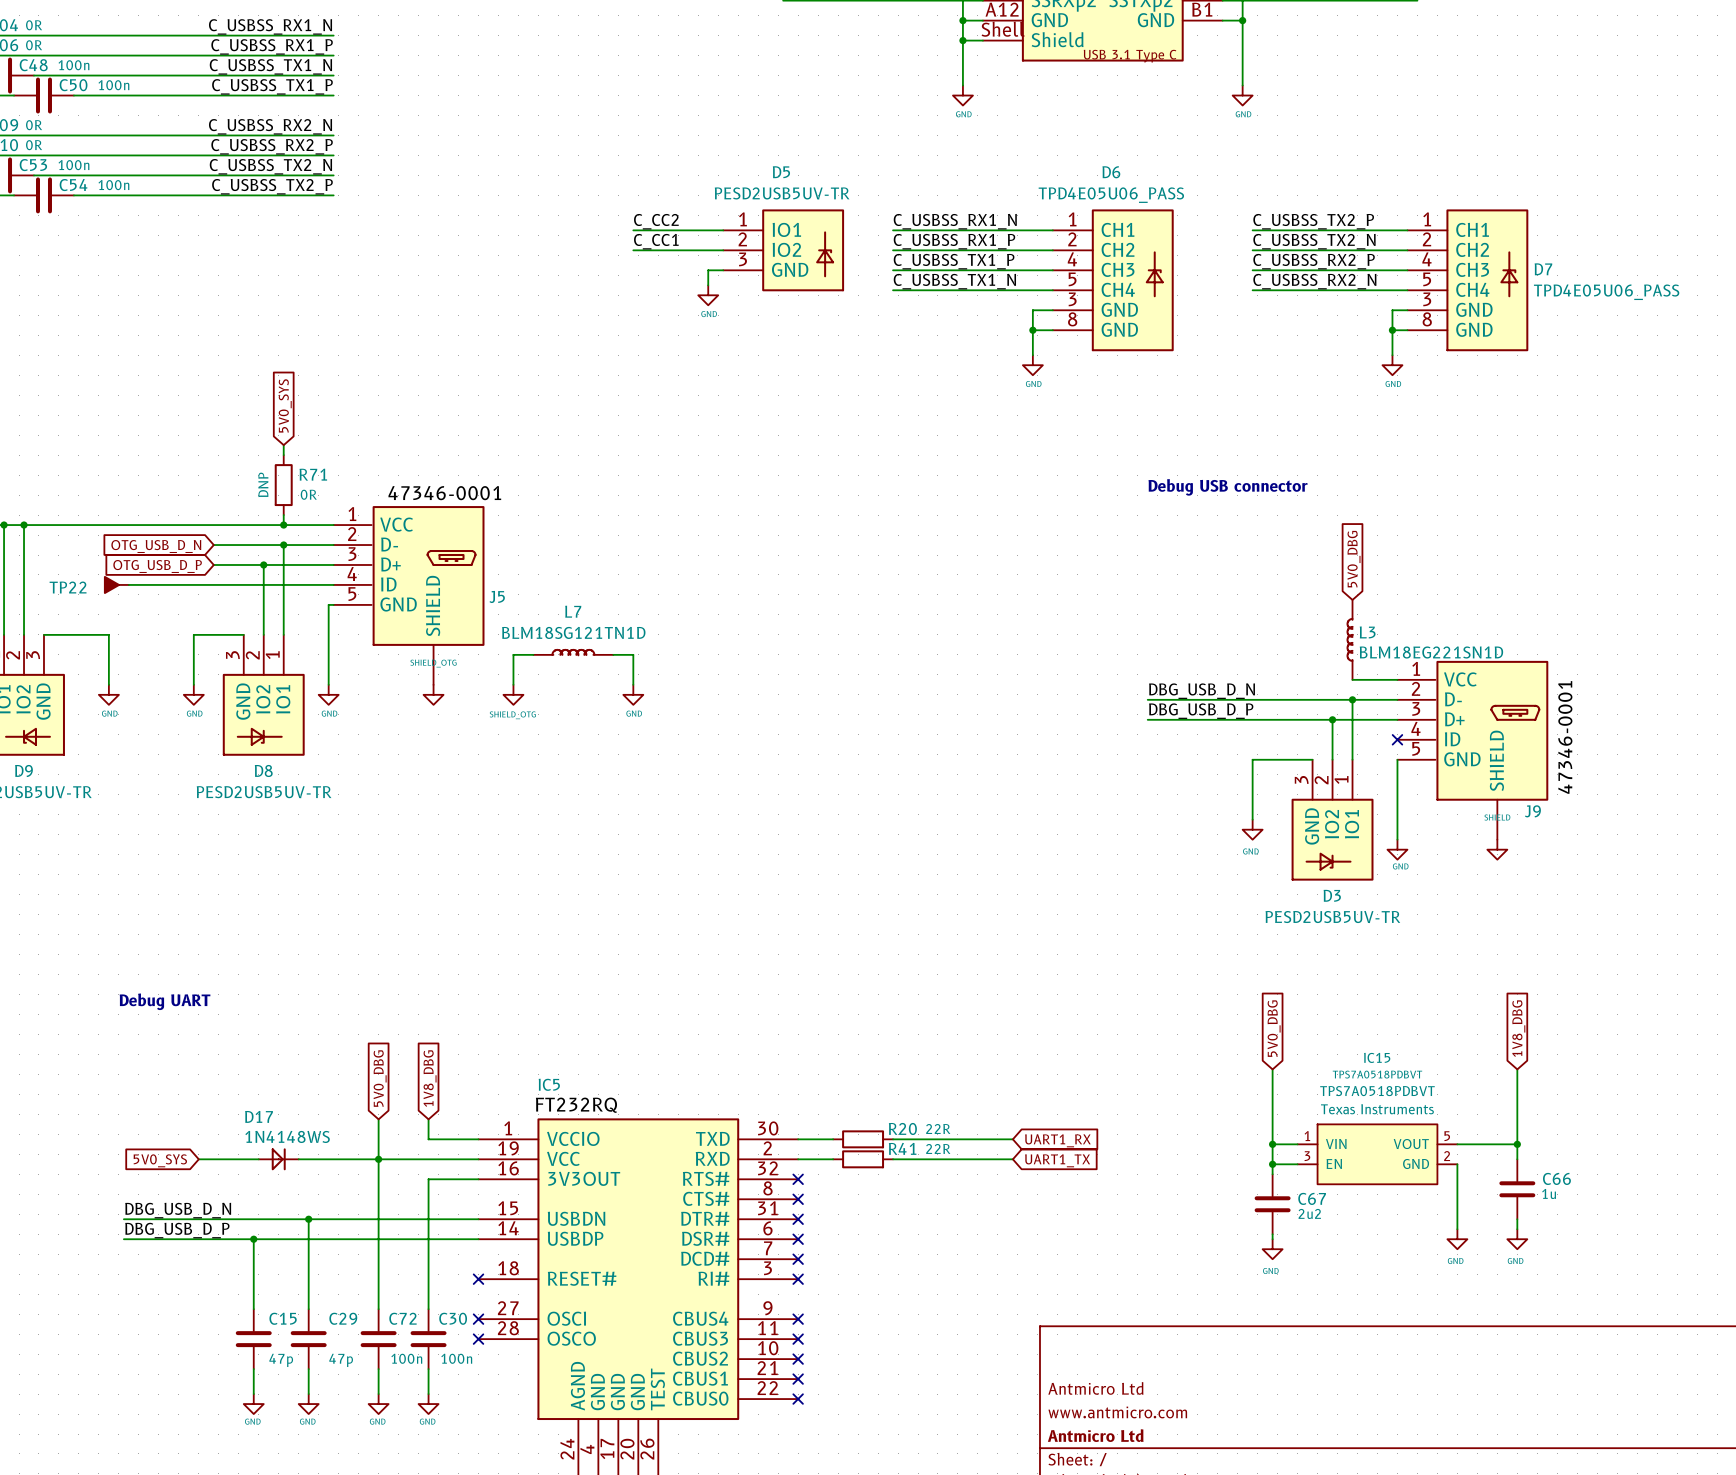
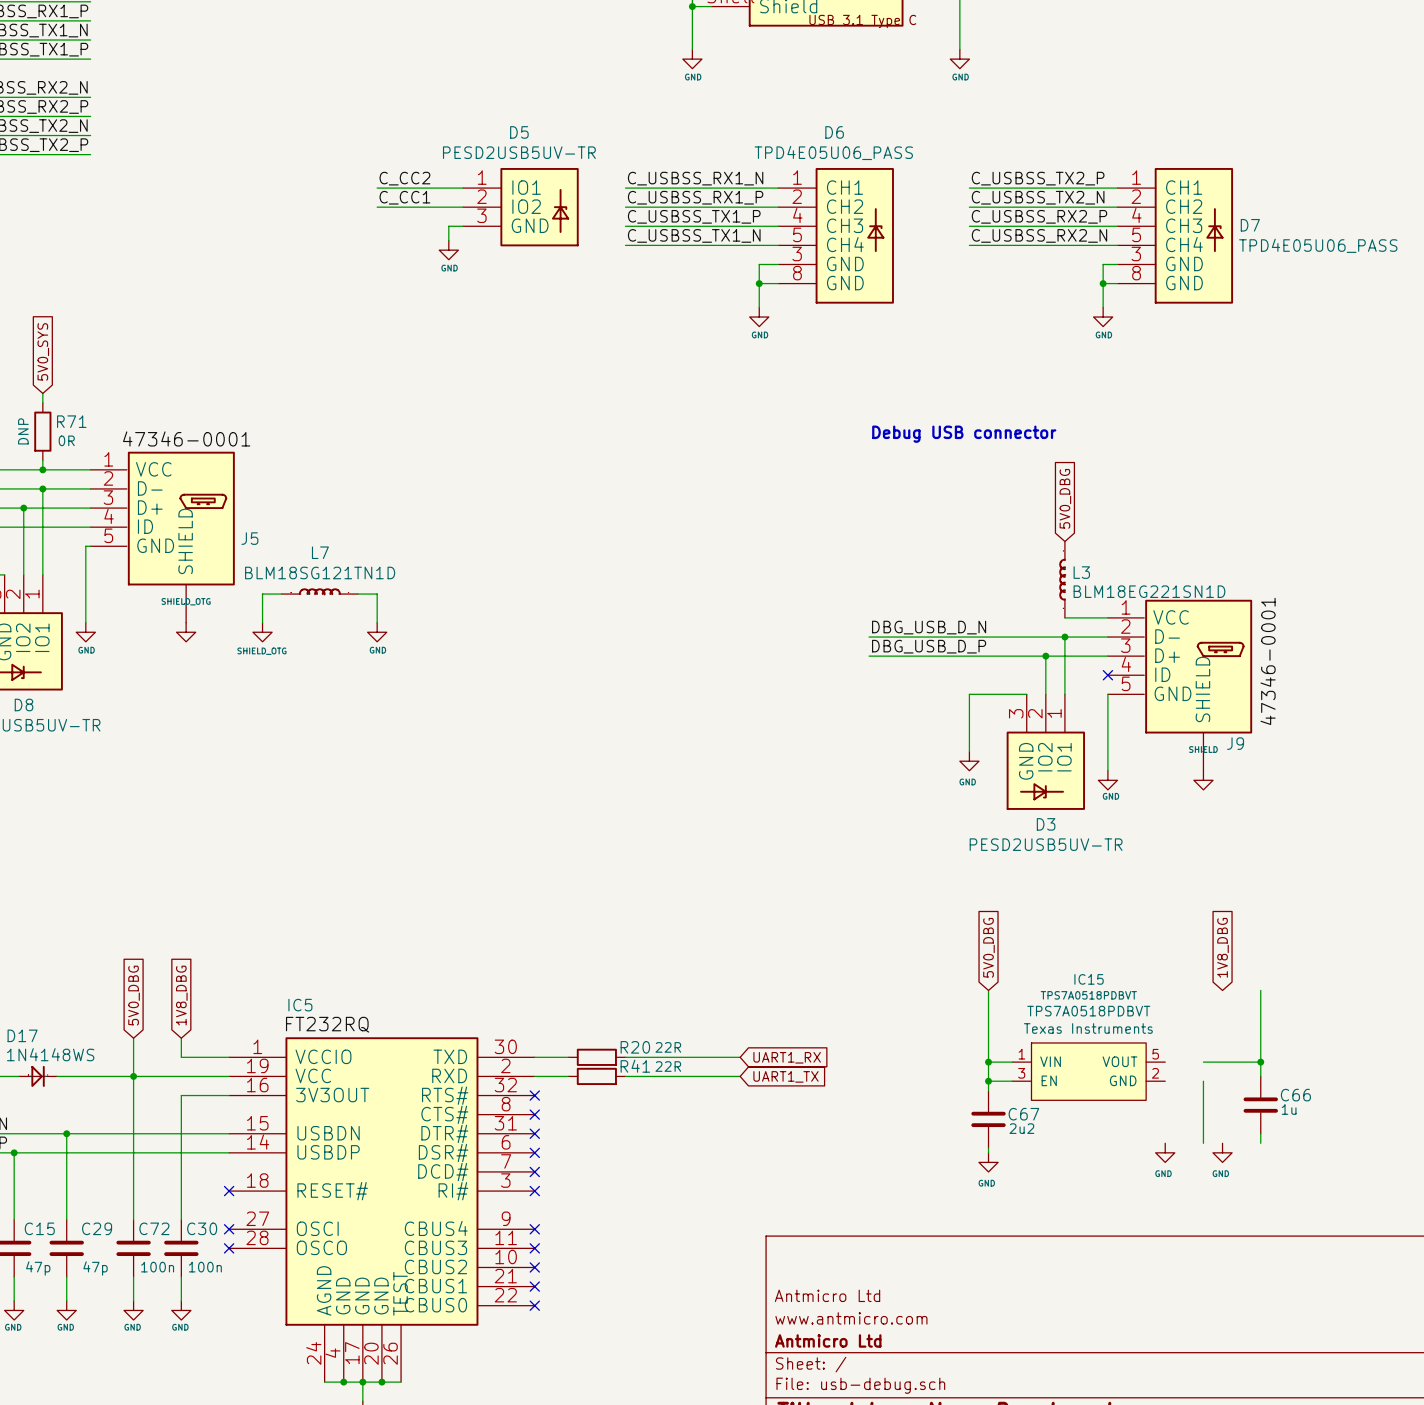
wire: (1517, 1069) (1517, 1159) -> (1260, 990) (1260, 1076)
wire: (1457, 1144) (1497, 1144) -> (1222, 1062) (1260, 1062)
junction position: (1517, 1144) -> (1260, 1062)
wire: (1457, 1164) (1457, 1229) -> (1203, 1081) (1203, 1143)
C66 position: (1517, 1189) -> (1260, 1105)
wire: (1517, 1219) (1517, 1229) -> (1260, 1133) (1260, 1143)

